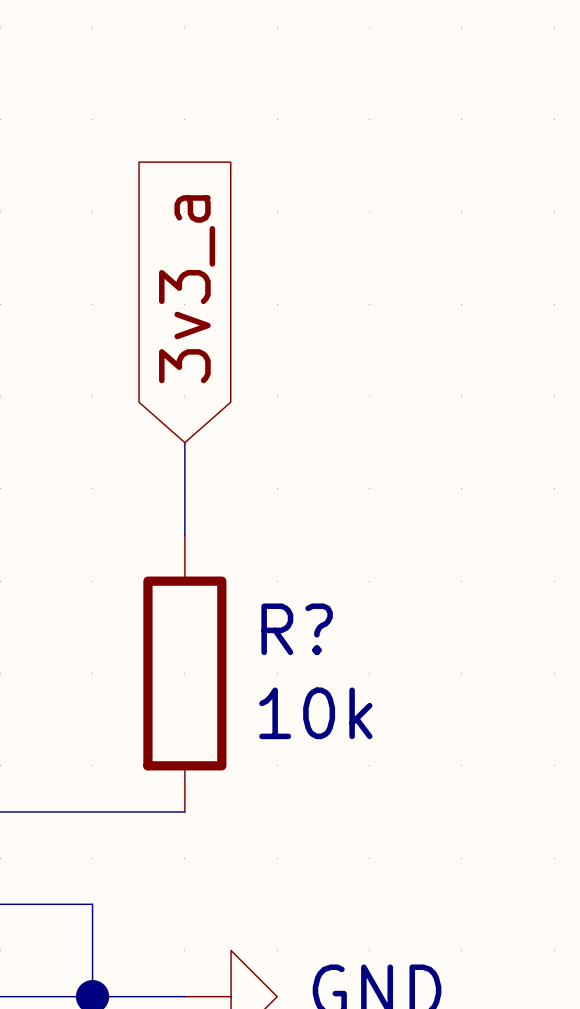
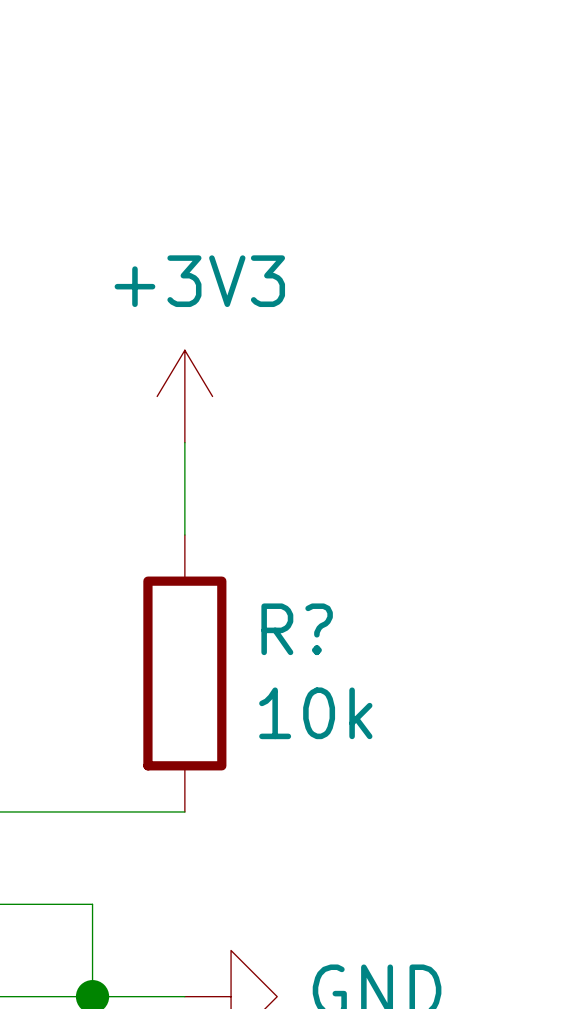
global label: 3v3_a (187, 289) -> none
power symbol: none -> +3V3 (184, 396)

